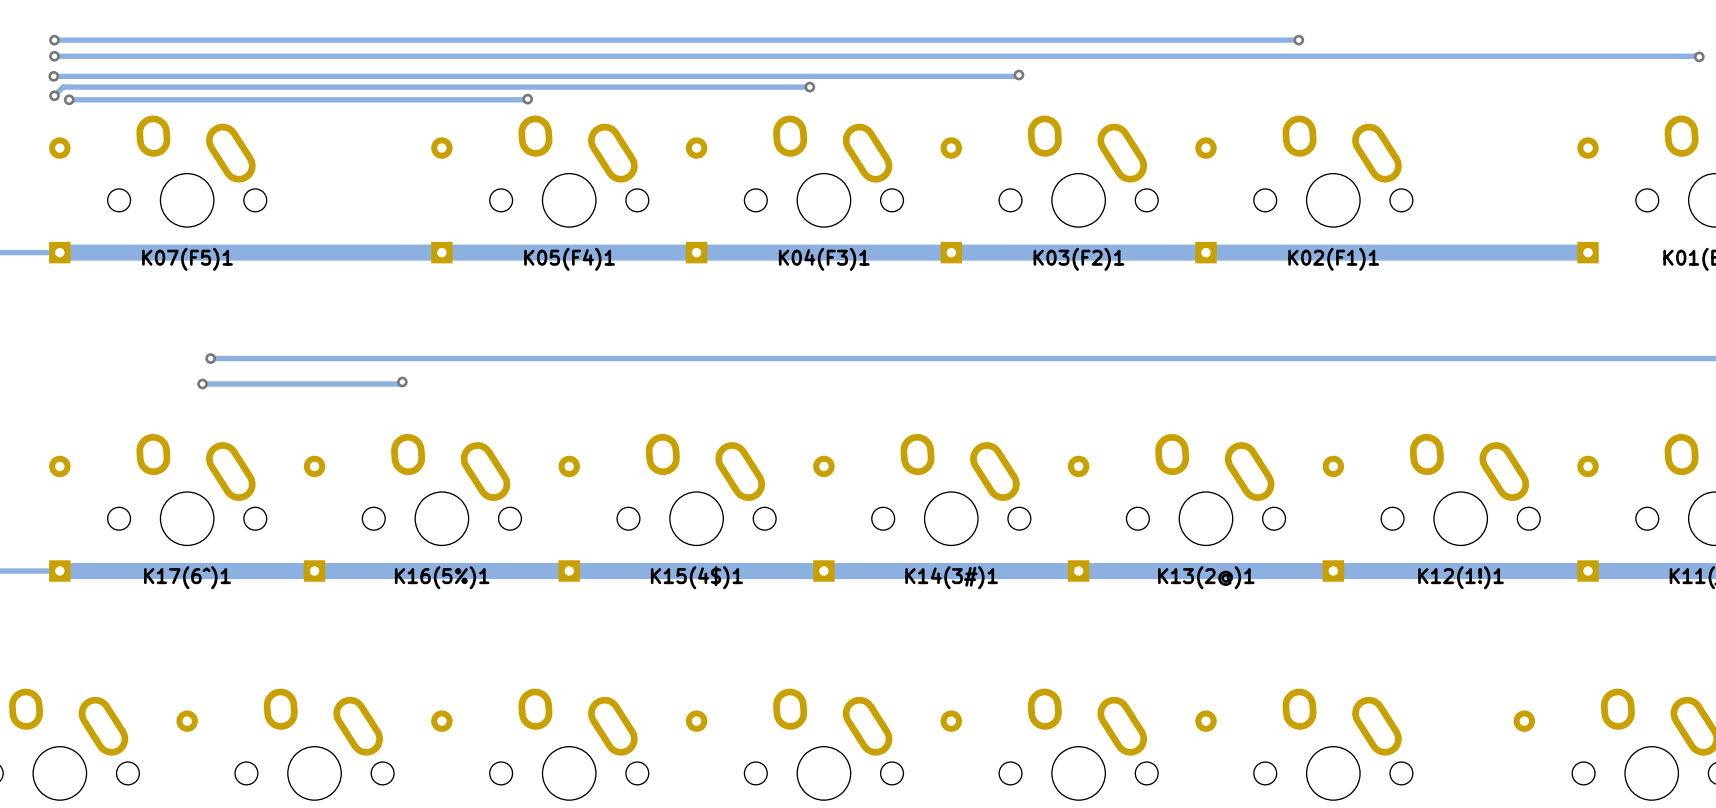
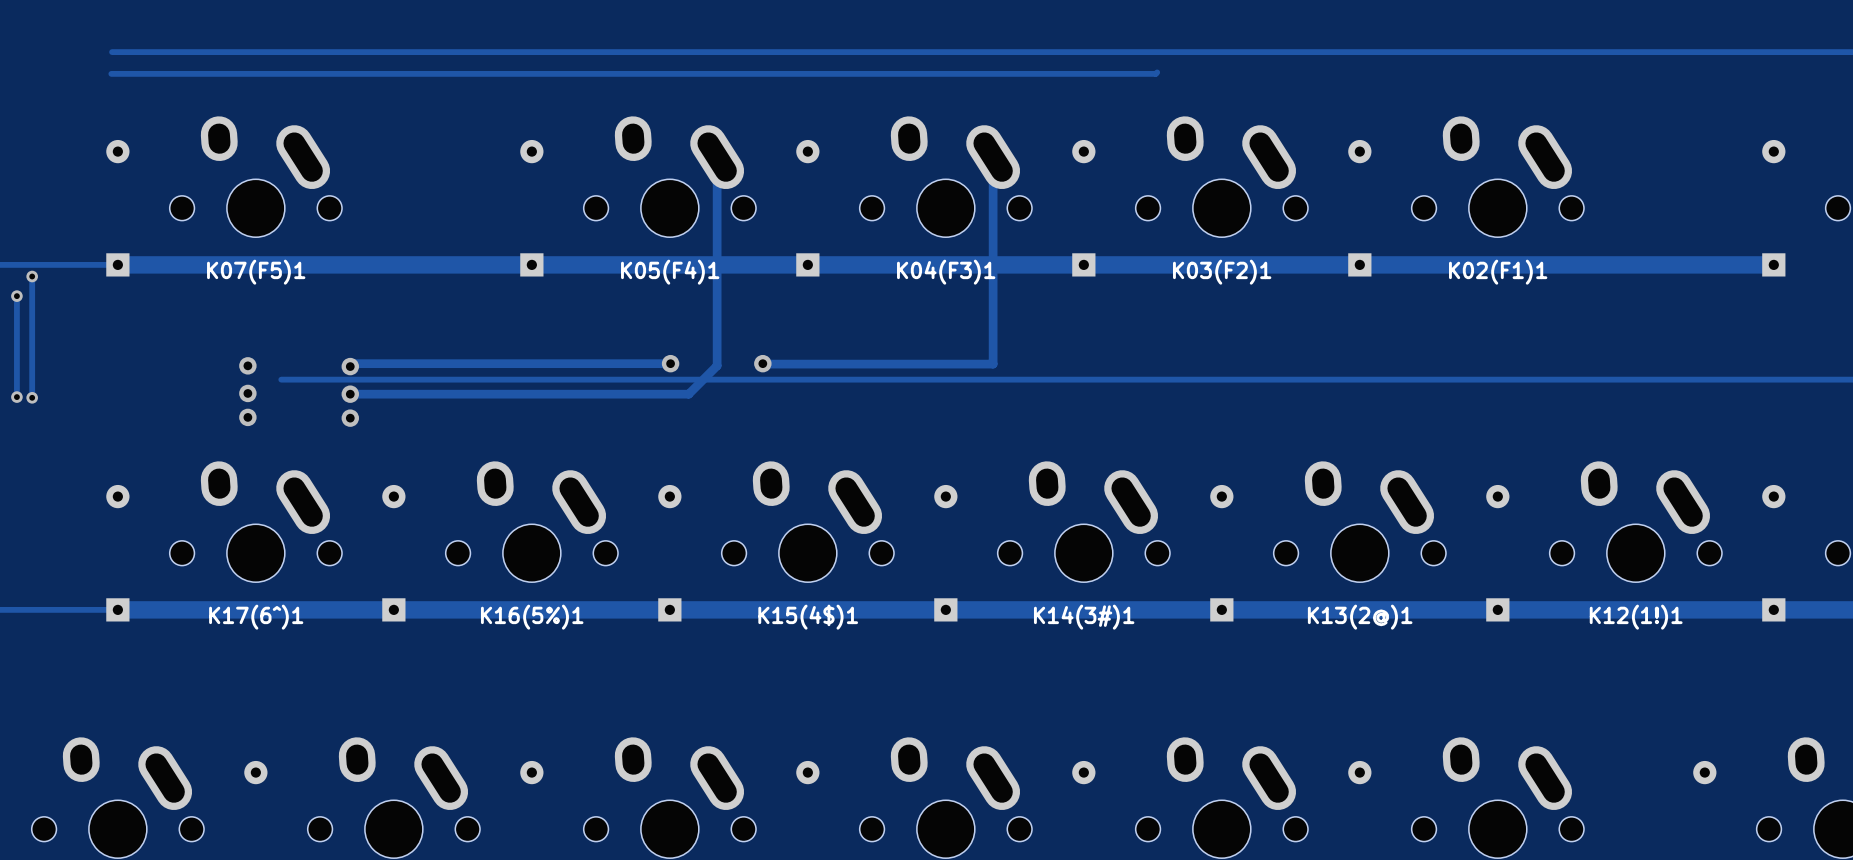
via: (54, 40) -> none
track: (1298, 40) (54, 40) -> none
via: (1298, 40) -> none
via: (54, 56) -> none
via: (1018, 75) -> none
via: (53, 76) -> none
track: (809, 87) (63, 87) (54, 95) -> none
via: (809, 87) -> none
via: (54, 95) -> none
via: (69, 99) -> none
track: (527, 99) (69, 99) -> none
via: (527, 99) -> none
track: none -> (717, 157) (717, 365) (688, 394) (350, 394)
track: none -> (993, 157) (993, 364) (762, 363)
track: none -> (670, 363) (353, 363) (350, 366)
via: none -> (670, 363)
via: none -> (762, 363)
via: none -> (247, 365)
via: none -> (350, 366)
via: (210, 358) -> none
via: none -> (247, 393)
via: none -> (350, 394)
track: (402, 381) (400, 384) (202, 384) -> none
via: (402, 381) -> none
via: (202, 384) -> none
via: none -> (247, 417)
via: none -> (350, 418)

